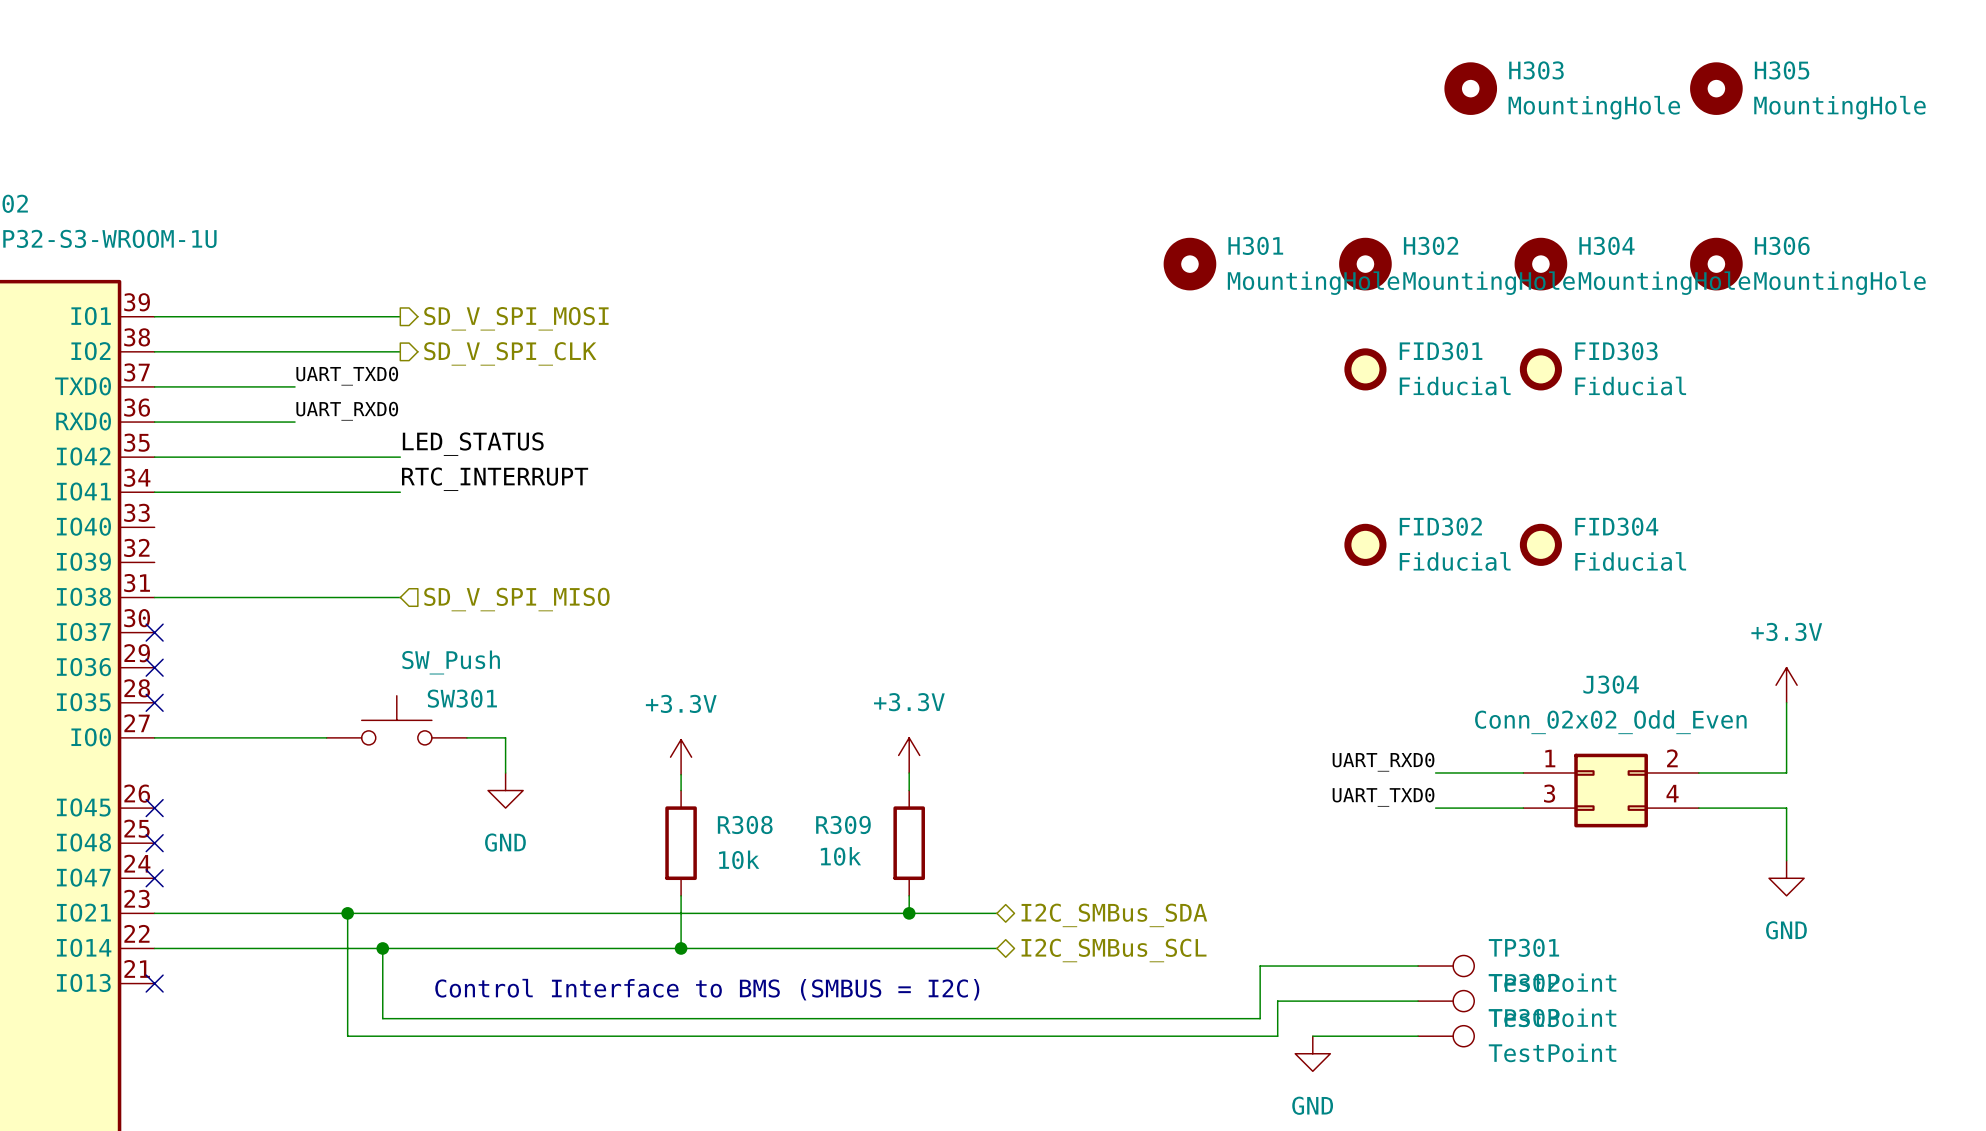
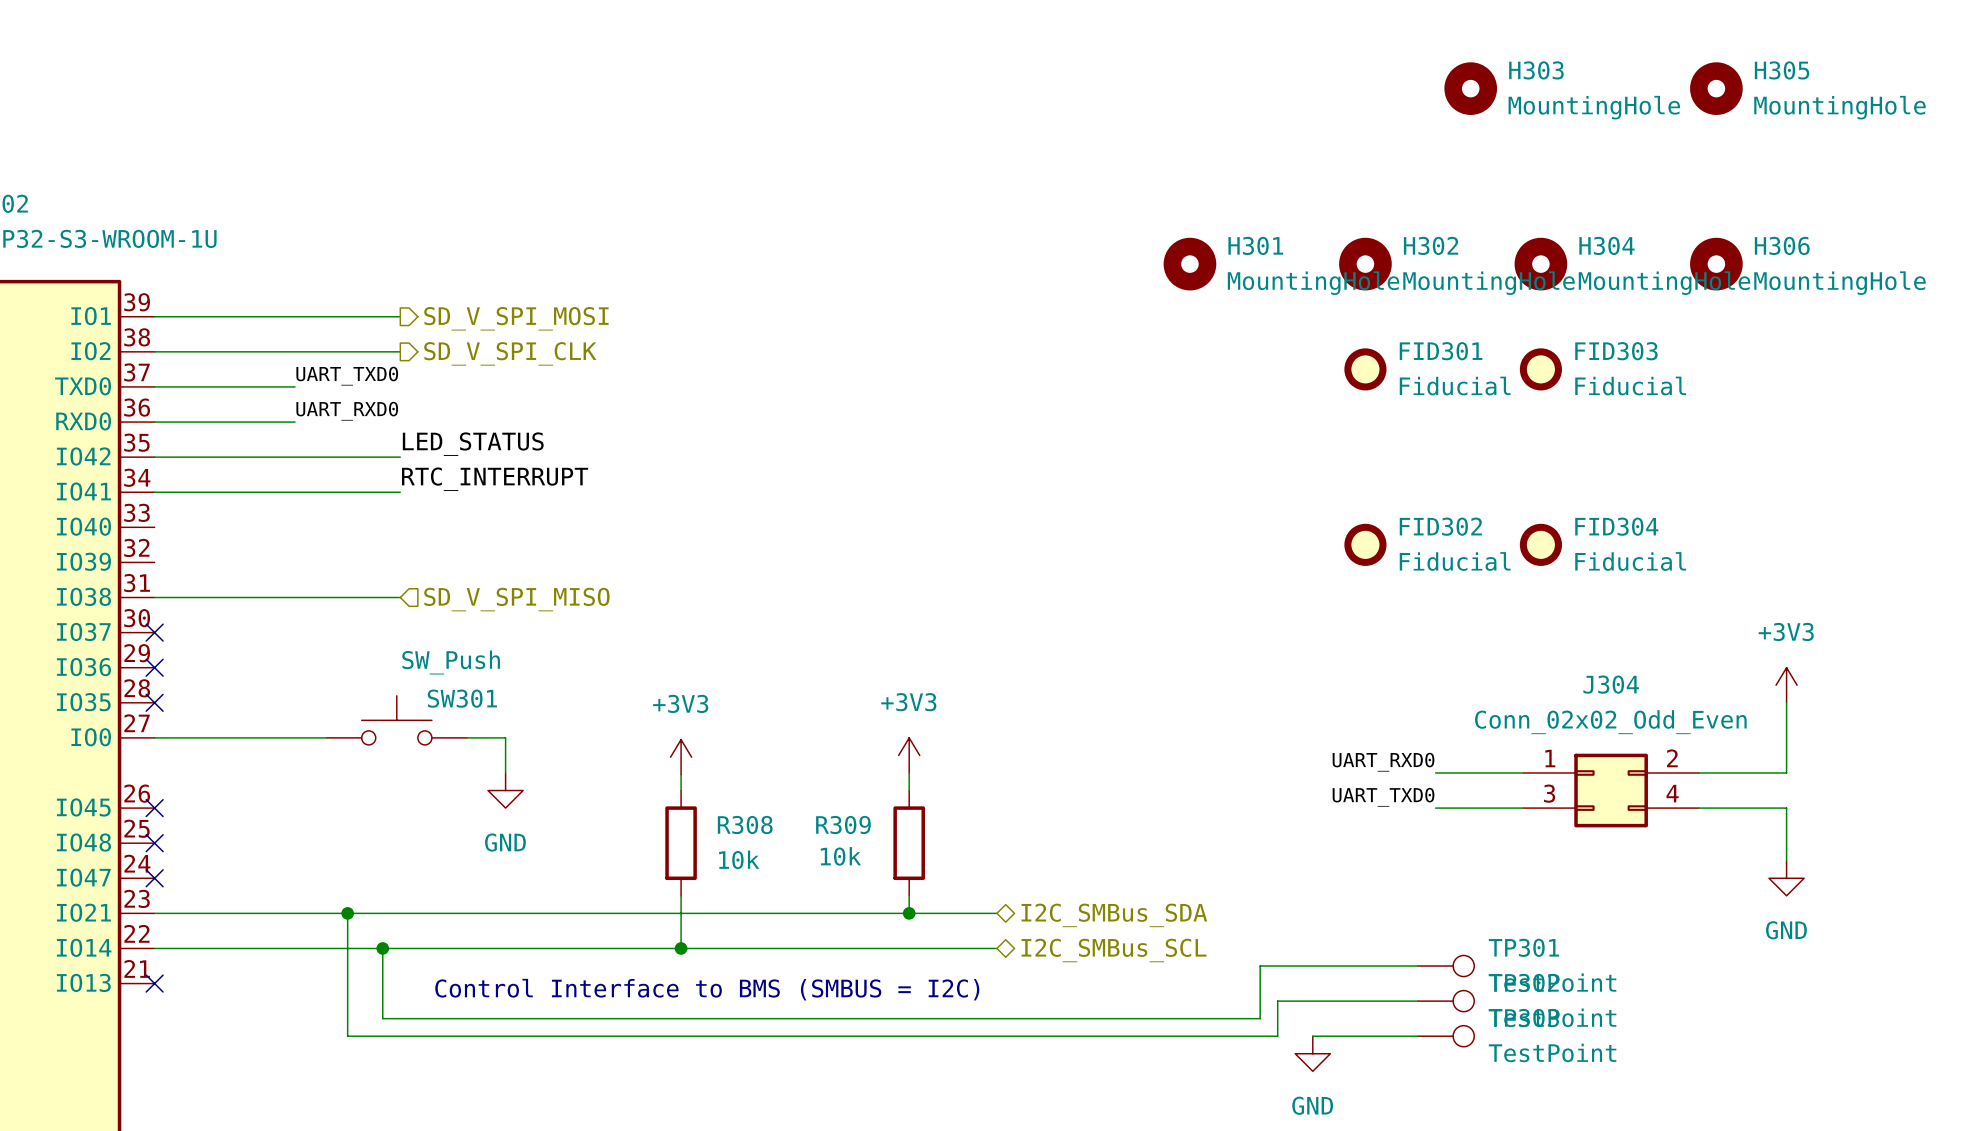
power symbol: +3.3V (1786, 685) -> +3V3 (1786, 685)
power symbol: +3.3V (909, 755) -> +3V3 (909, 755)
power symbol: +3.3V (681, 757) -> +3V3 (681, 757)

